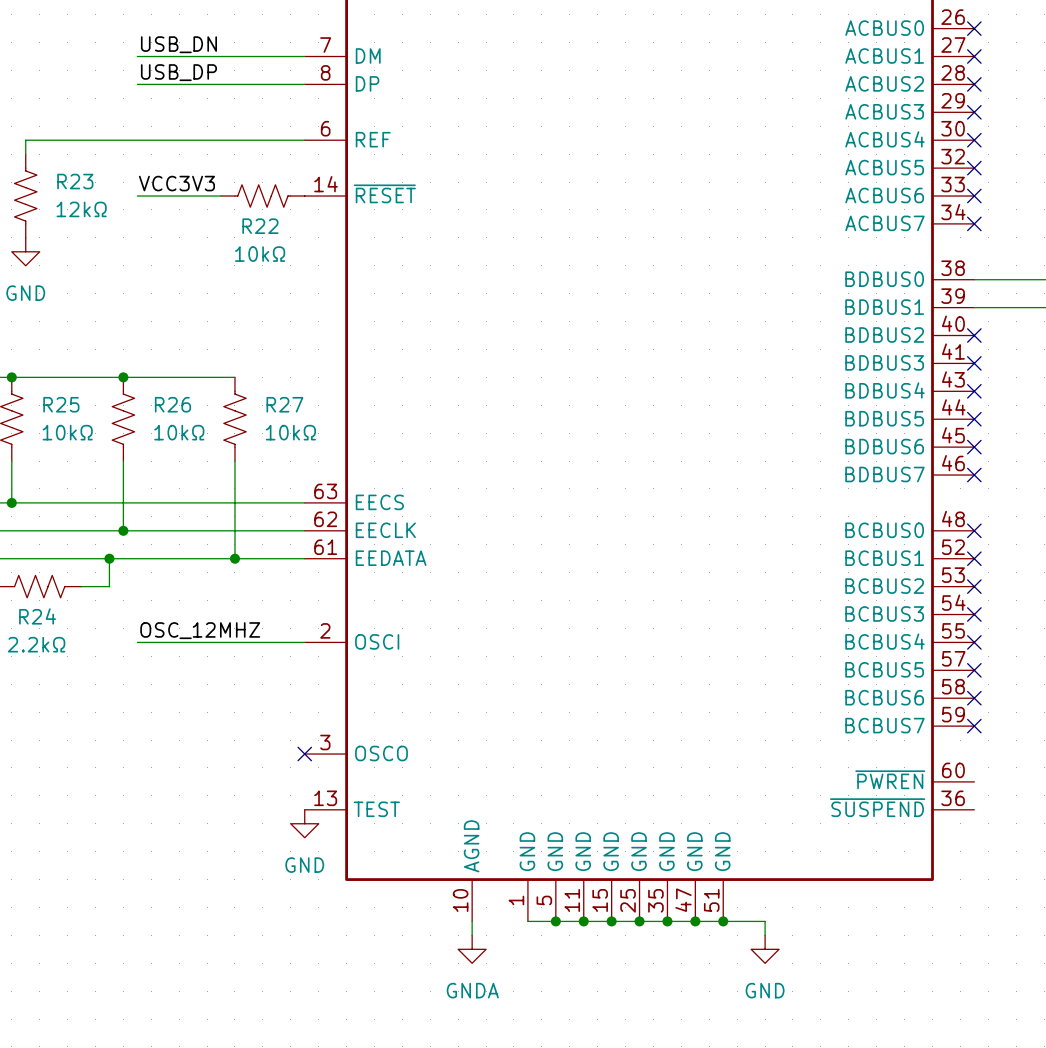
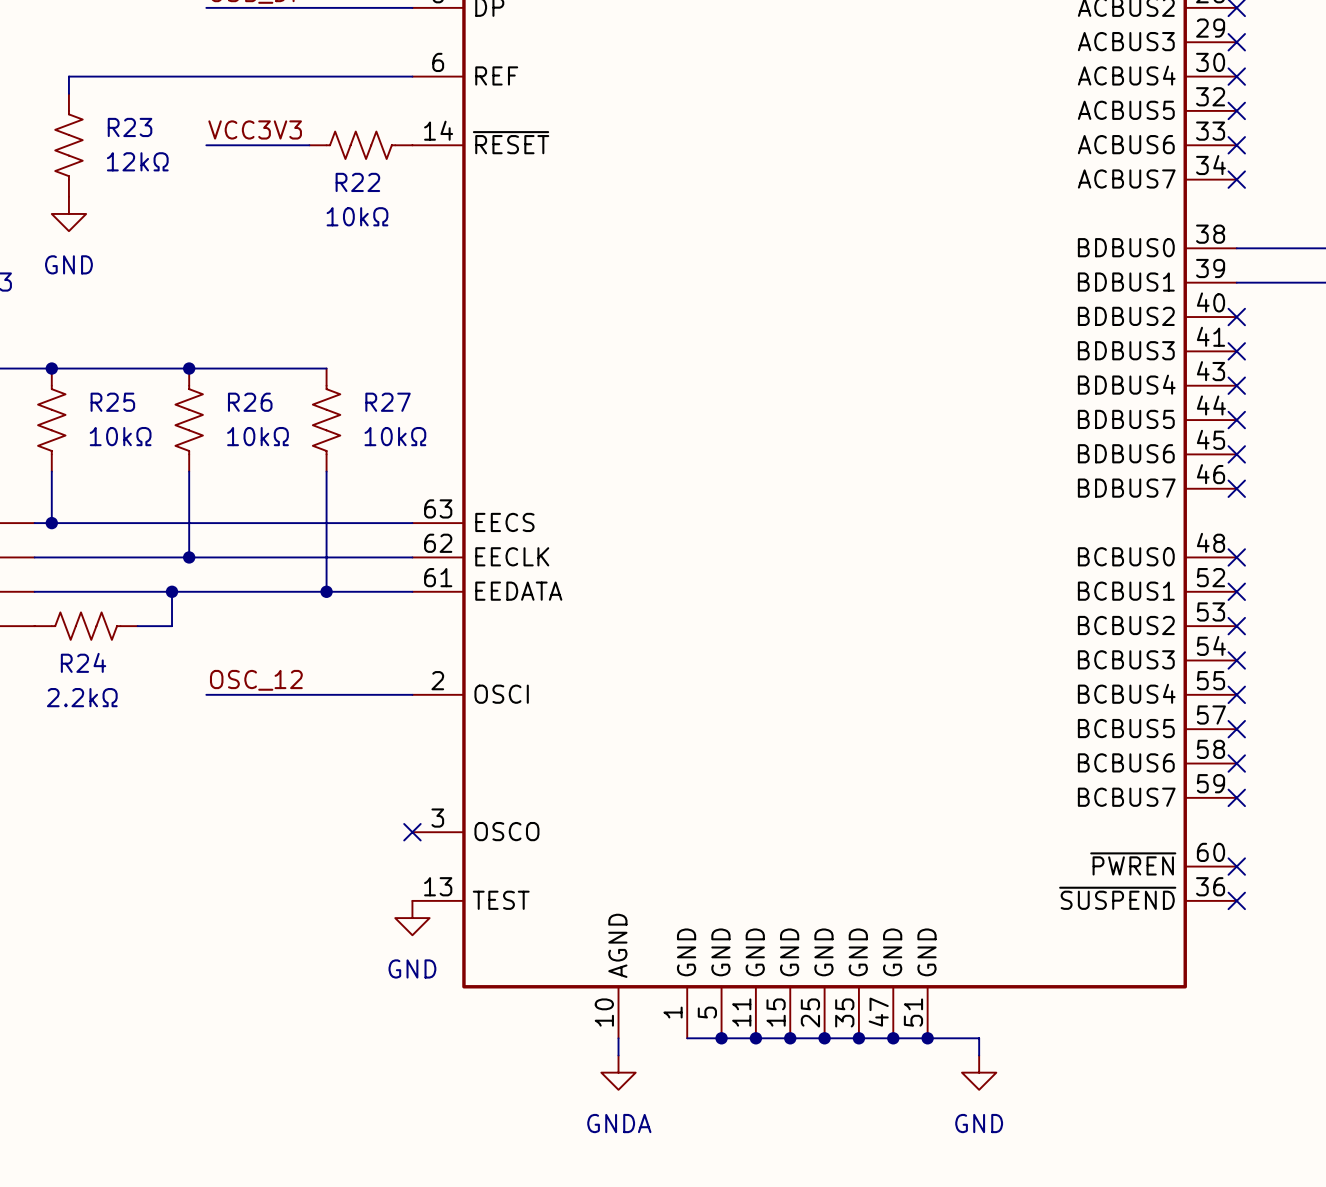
label: OSC_12MHZ (200, 630) -> OSC_12 (256, 680)
no-connect mark: none -> (1236, 866)
no-connect mark: none -> (1236, 900)

